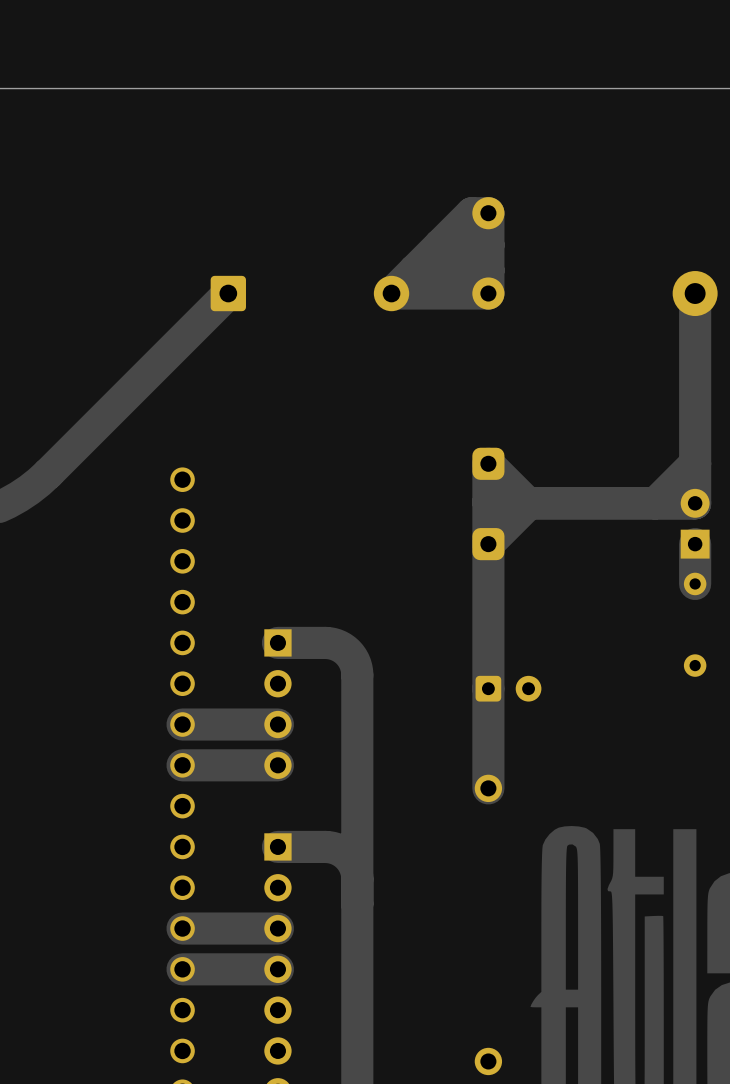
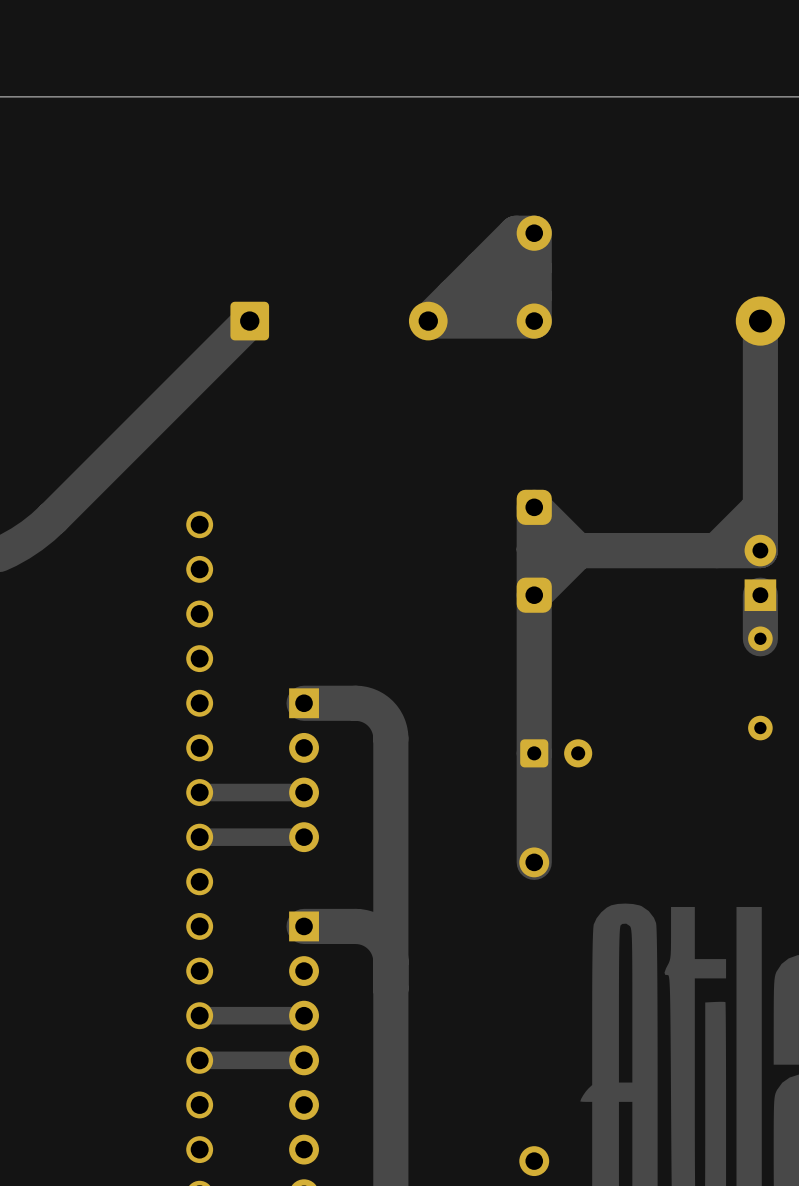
track width: thick (277, 724) (182, 724) -> thin (304, 792) (199, 792)
track width: thick (277, 765) (182, 765) -> thin (304, 837) (199, 837)
track width: thick (277, 928) (182, 928) -> thin (304, 1015) (199, 1015)
track width: thick (277, 969) (182, 969) -> thin (304, 1060) (199, 1060)

